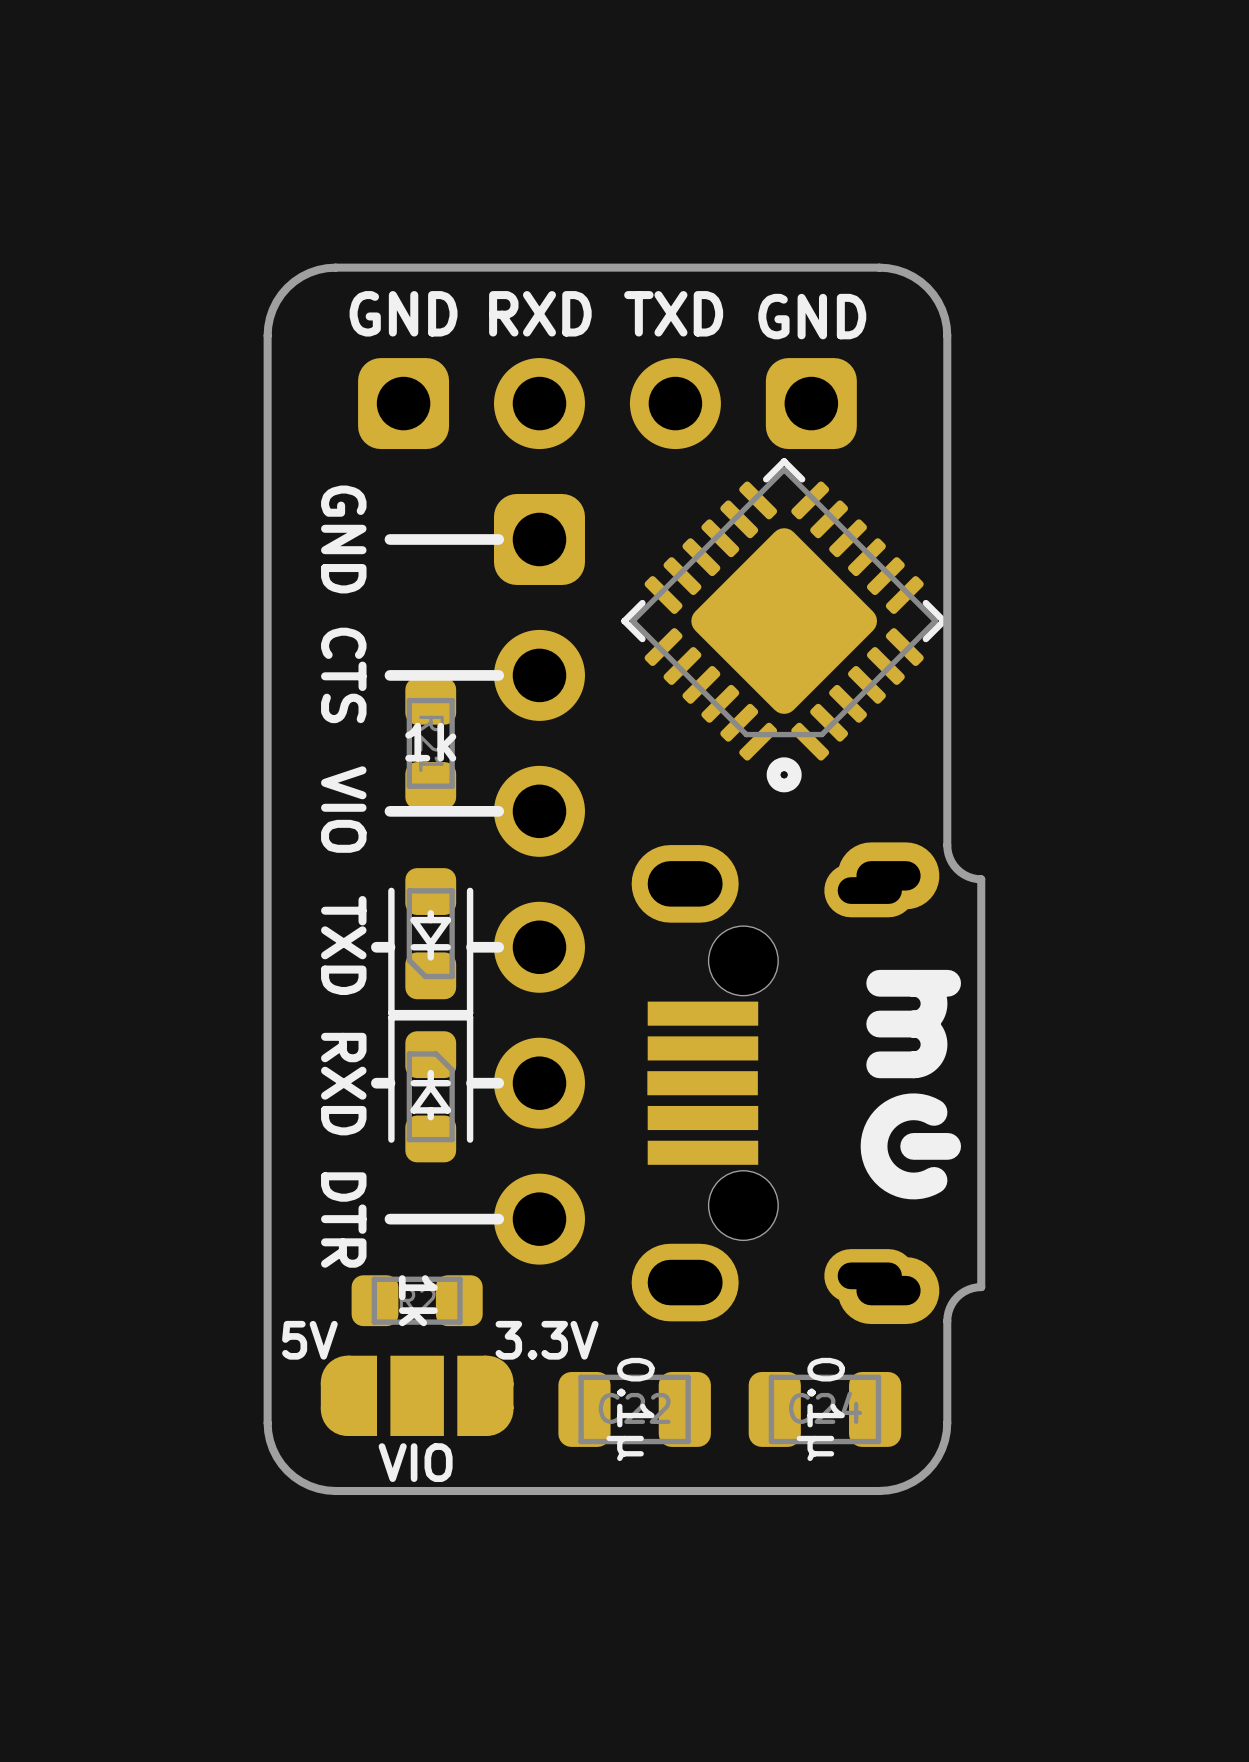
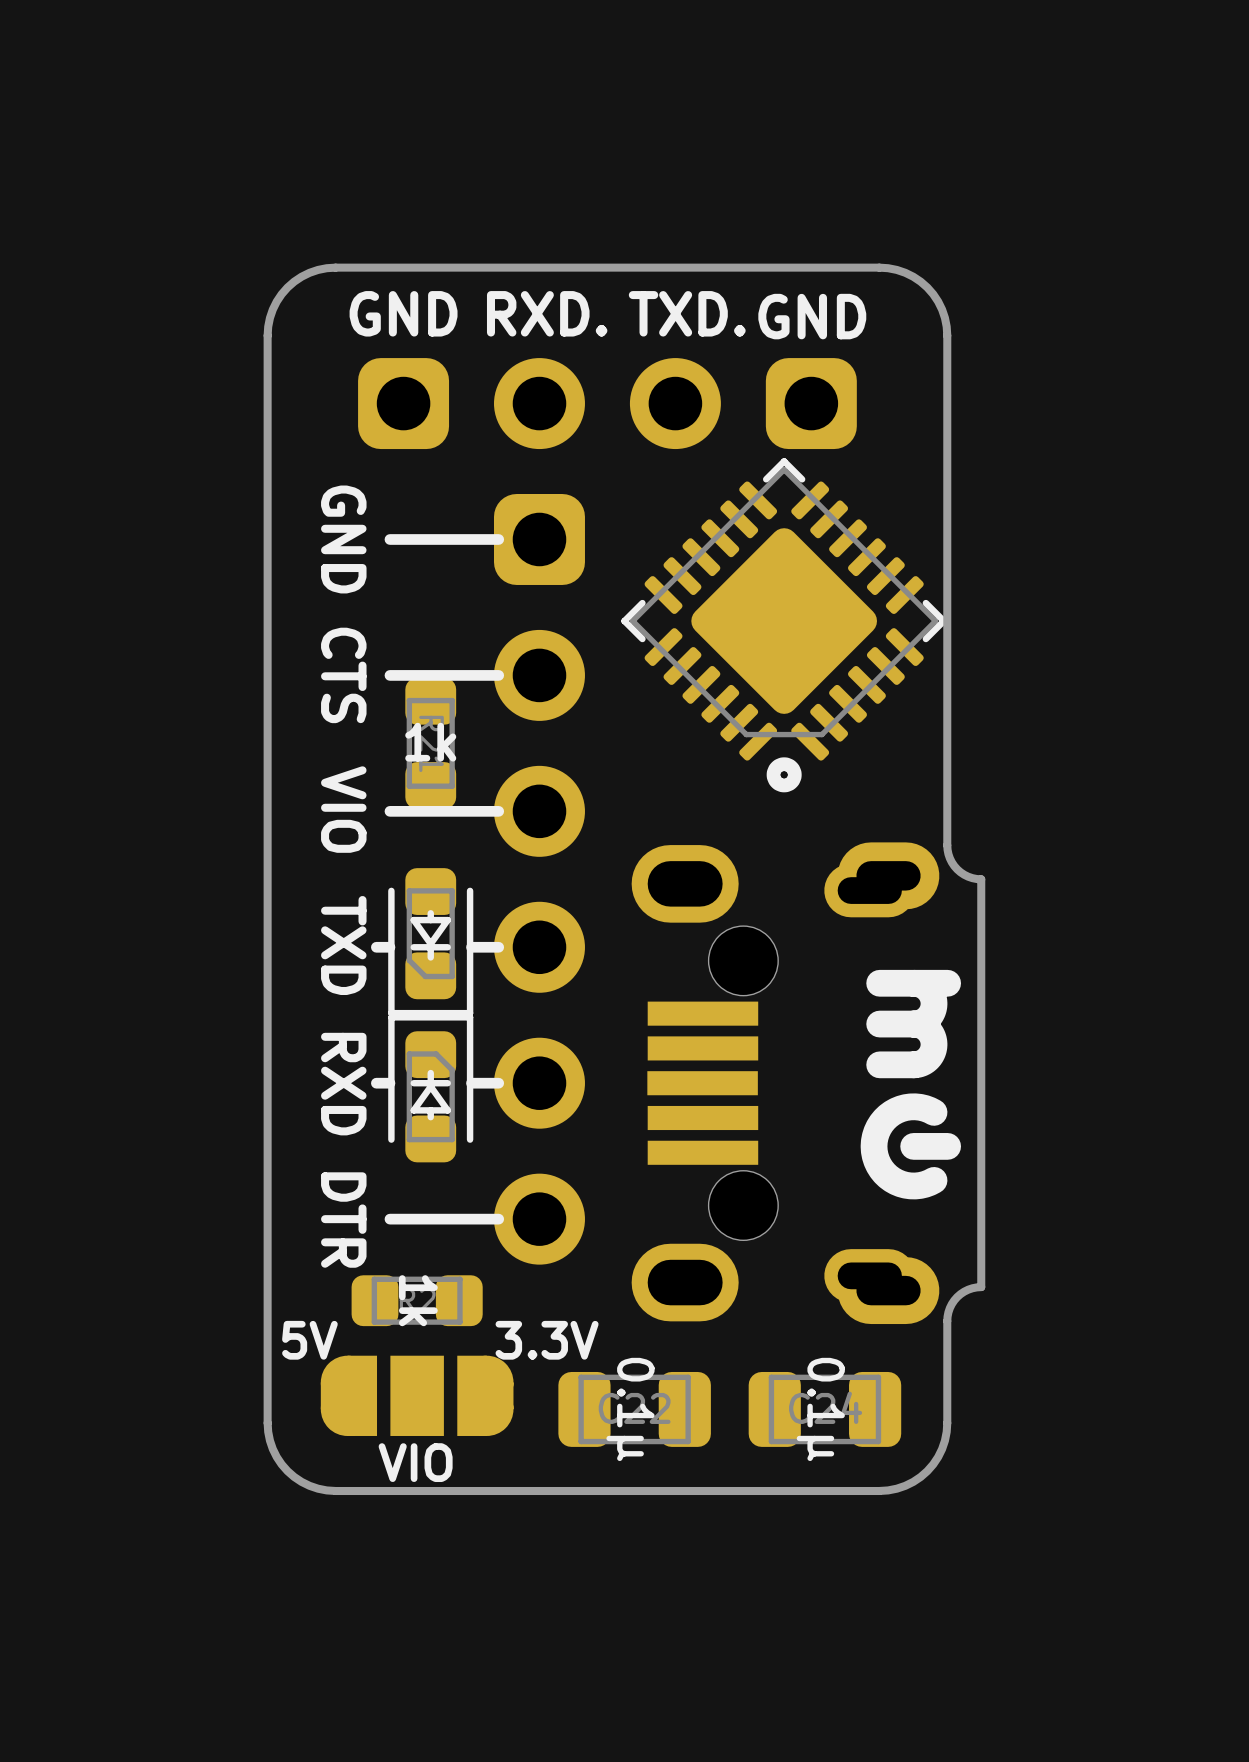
text: RXD (540, 313) -> RXD. (547, 313)
text: TXD (673, 313) -> TXD. (687, 313)

